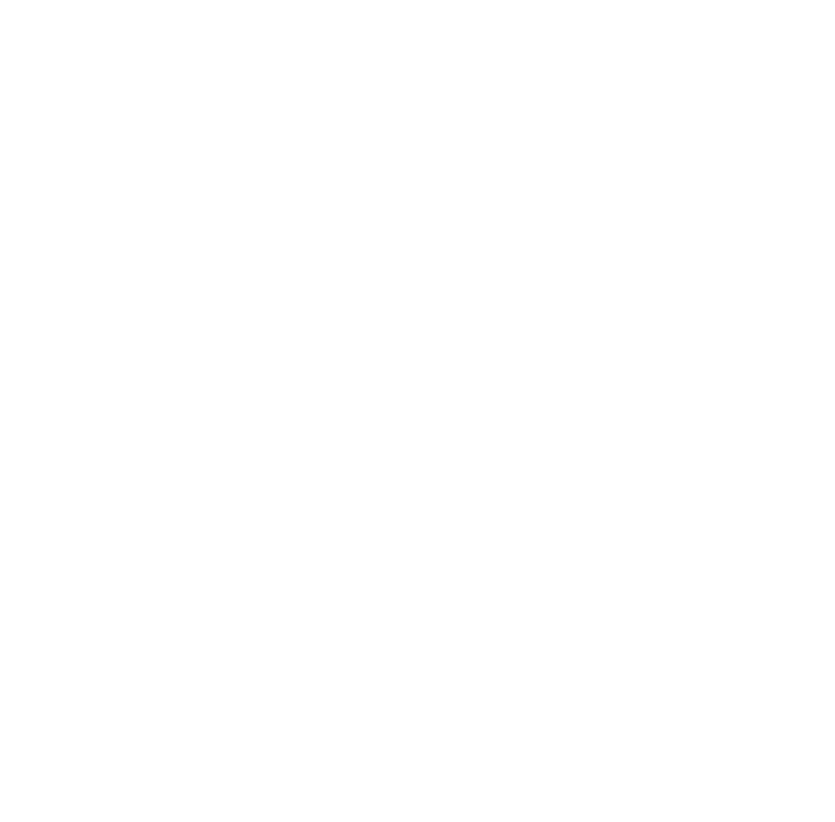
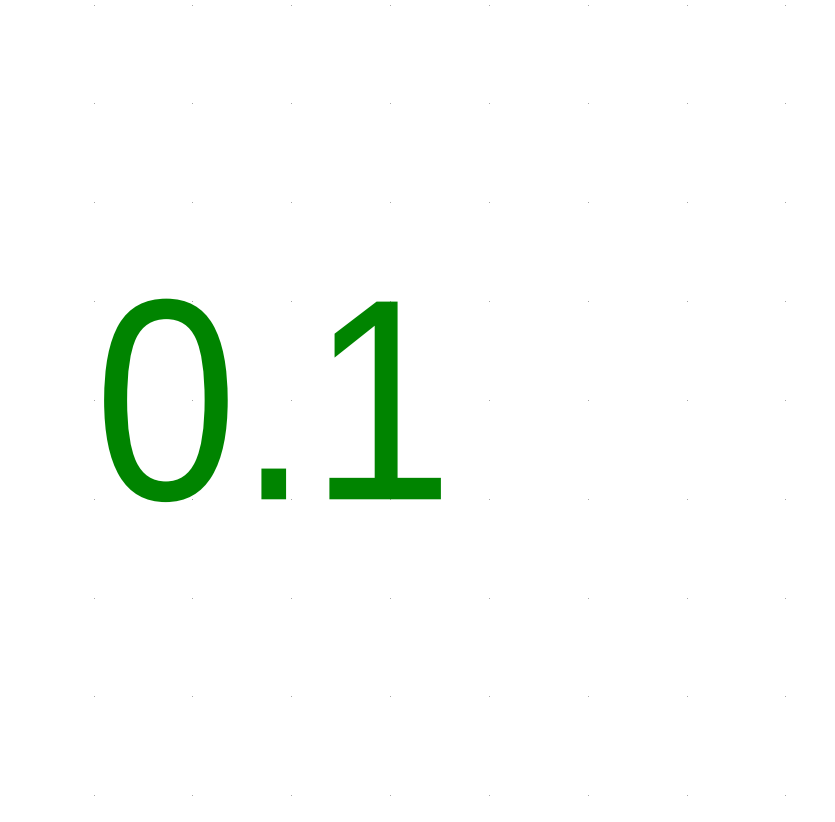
text: none -> 0.1 (272, 400)

